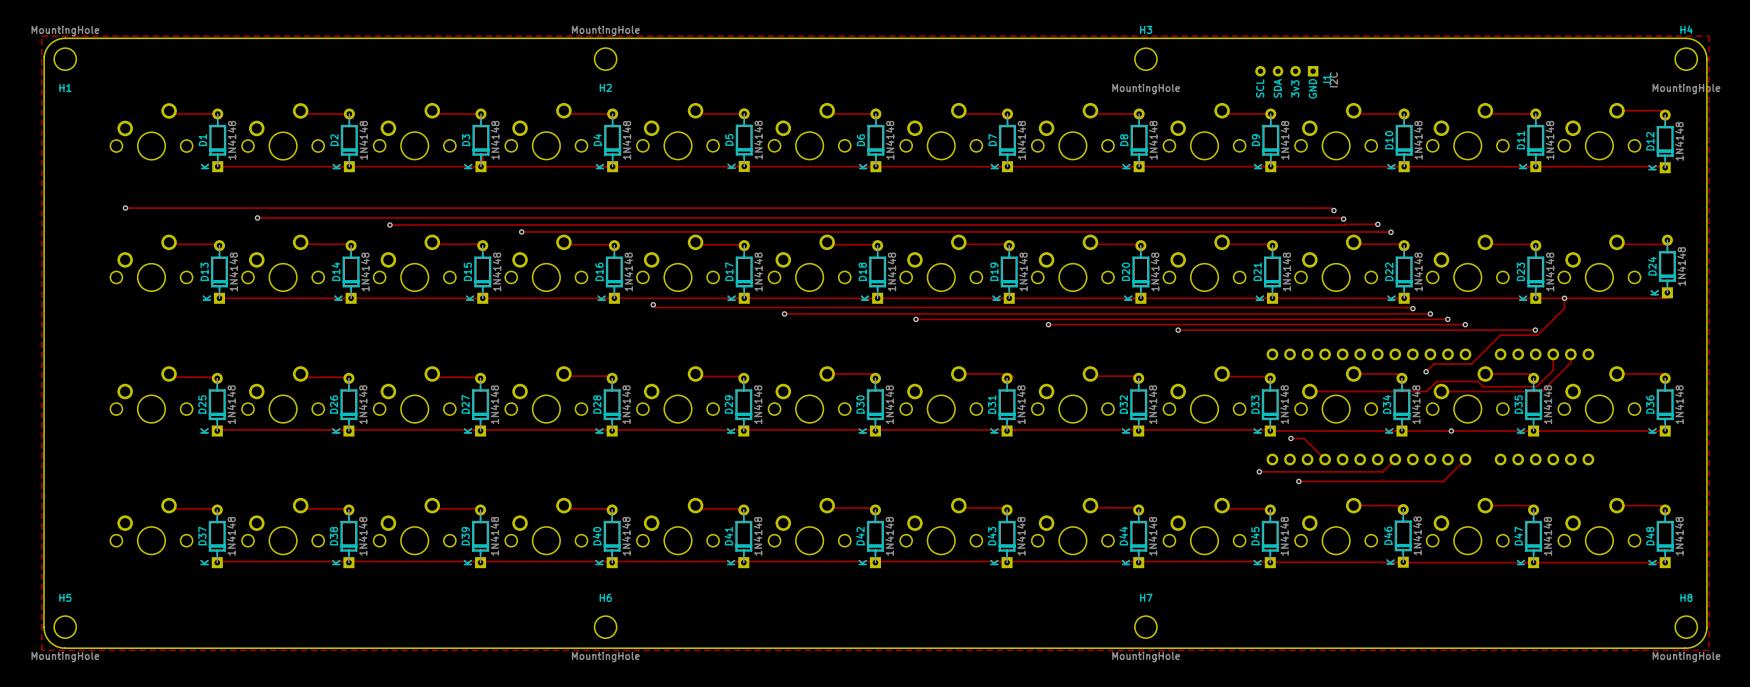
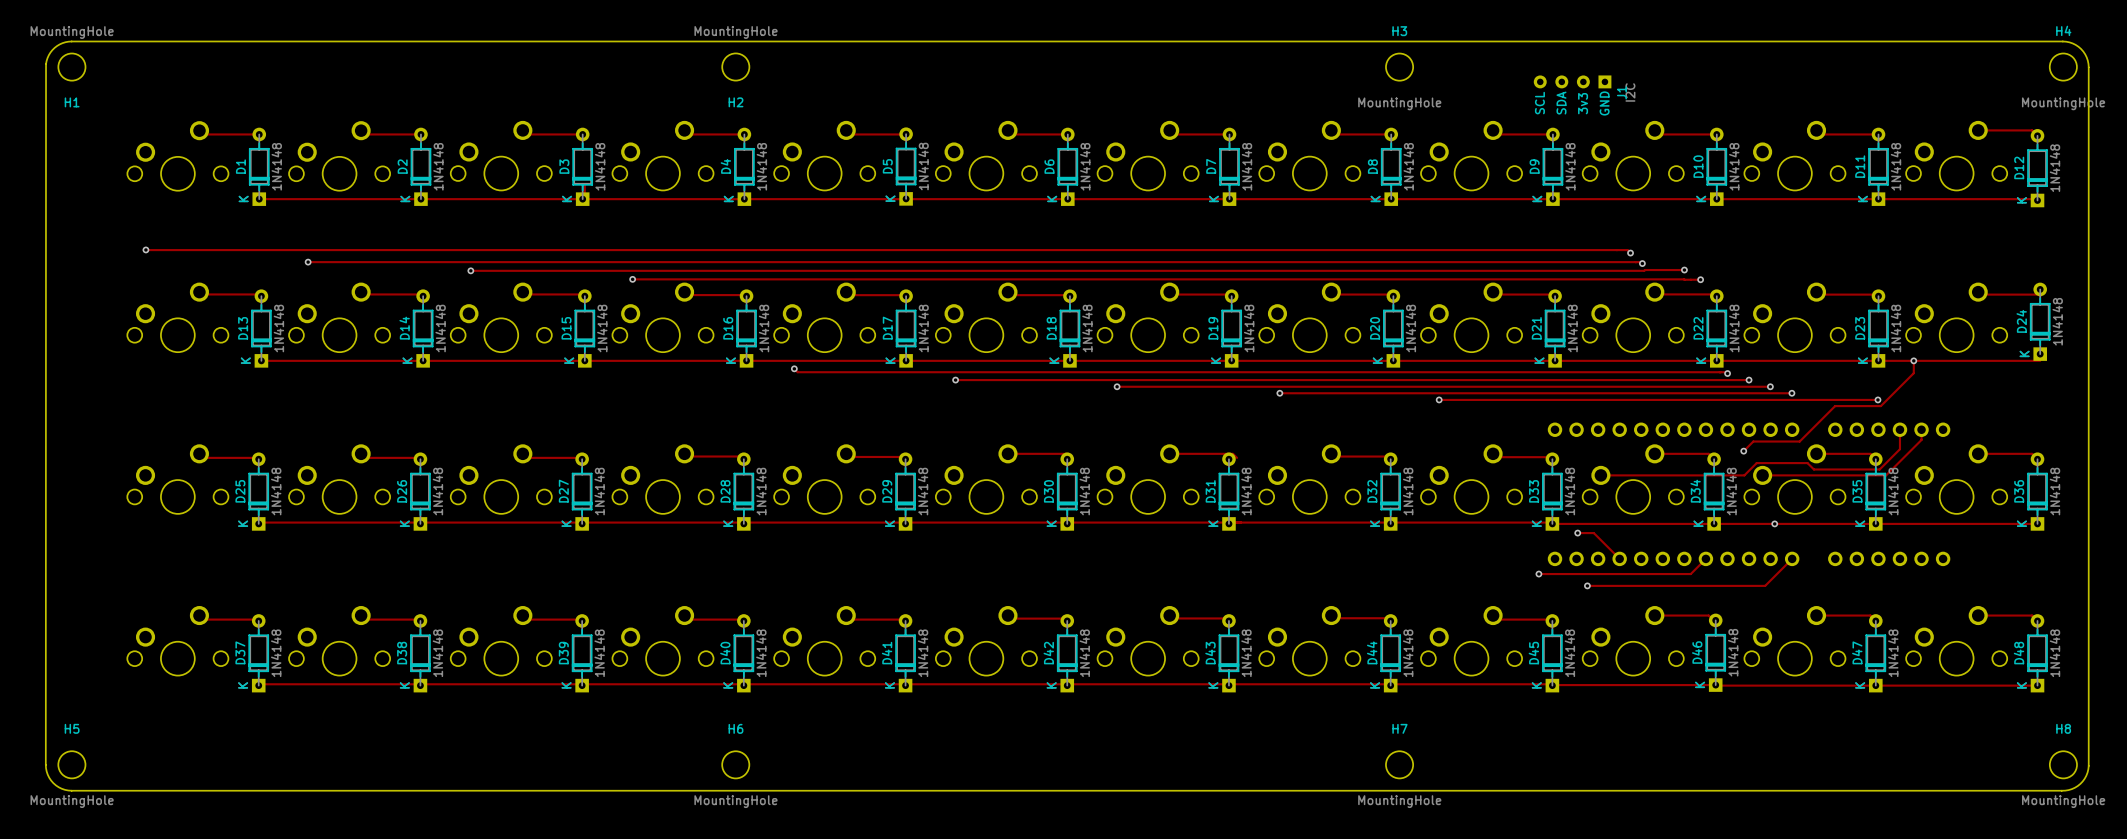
zone outline: (41, 36) (41, 650) (1709, 650) (1709, 36) (41, 36) -> none

